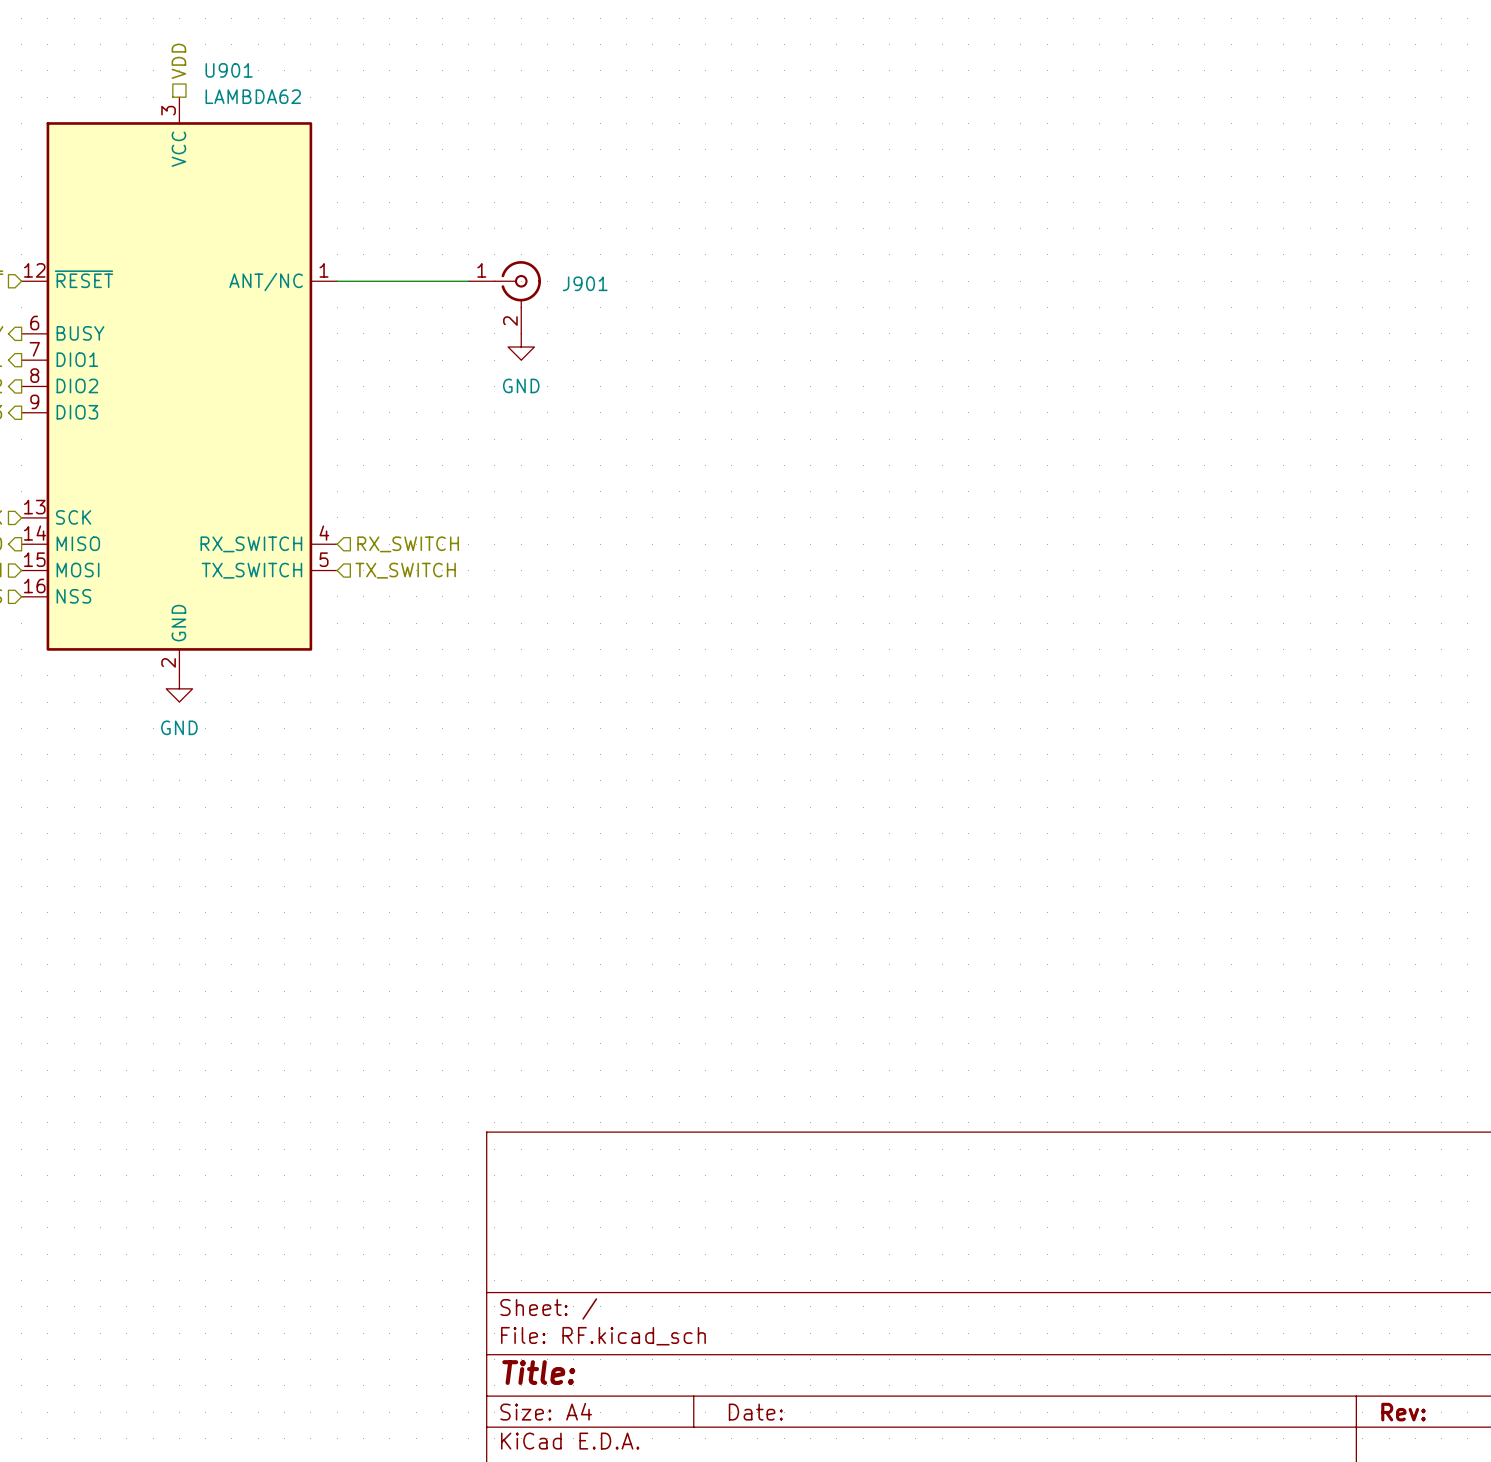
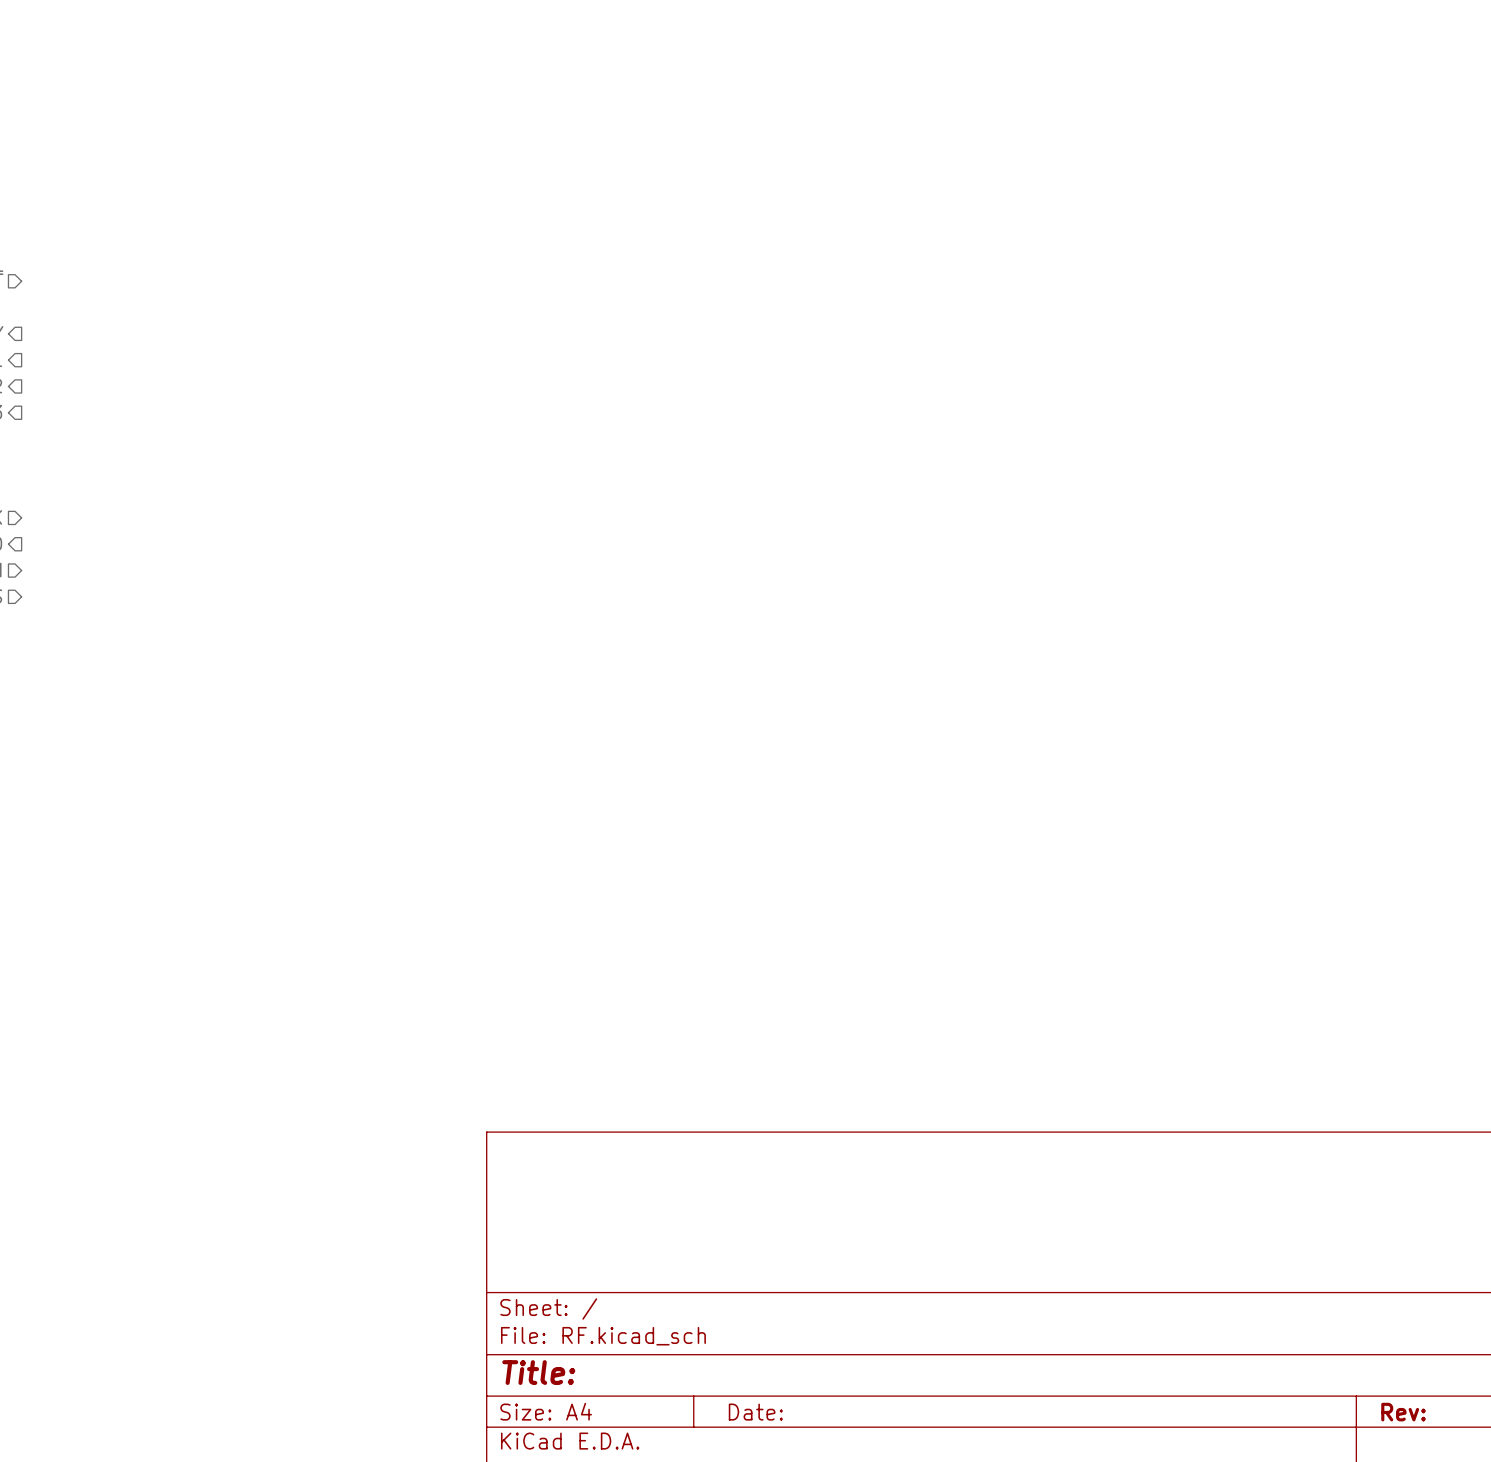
hierarchical label: VDD (178, 61) -> none
wire: (337, 281) (468, 281) -> none
J901: (504, 297) -> none
power symbol: GND (521, 347) -> none
U901: LAMBDA62 (179, 386) -> none
hierarchical label: RX_SWITCH (408, 544) -> none
hierarchical label: TX_SWITCH (405, 570) -> none
power symbol: GND (179, 688) -> none

